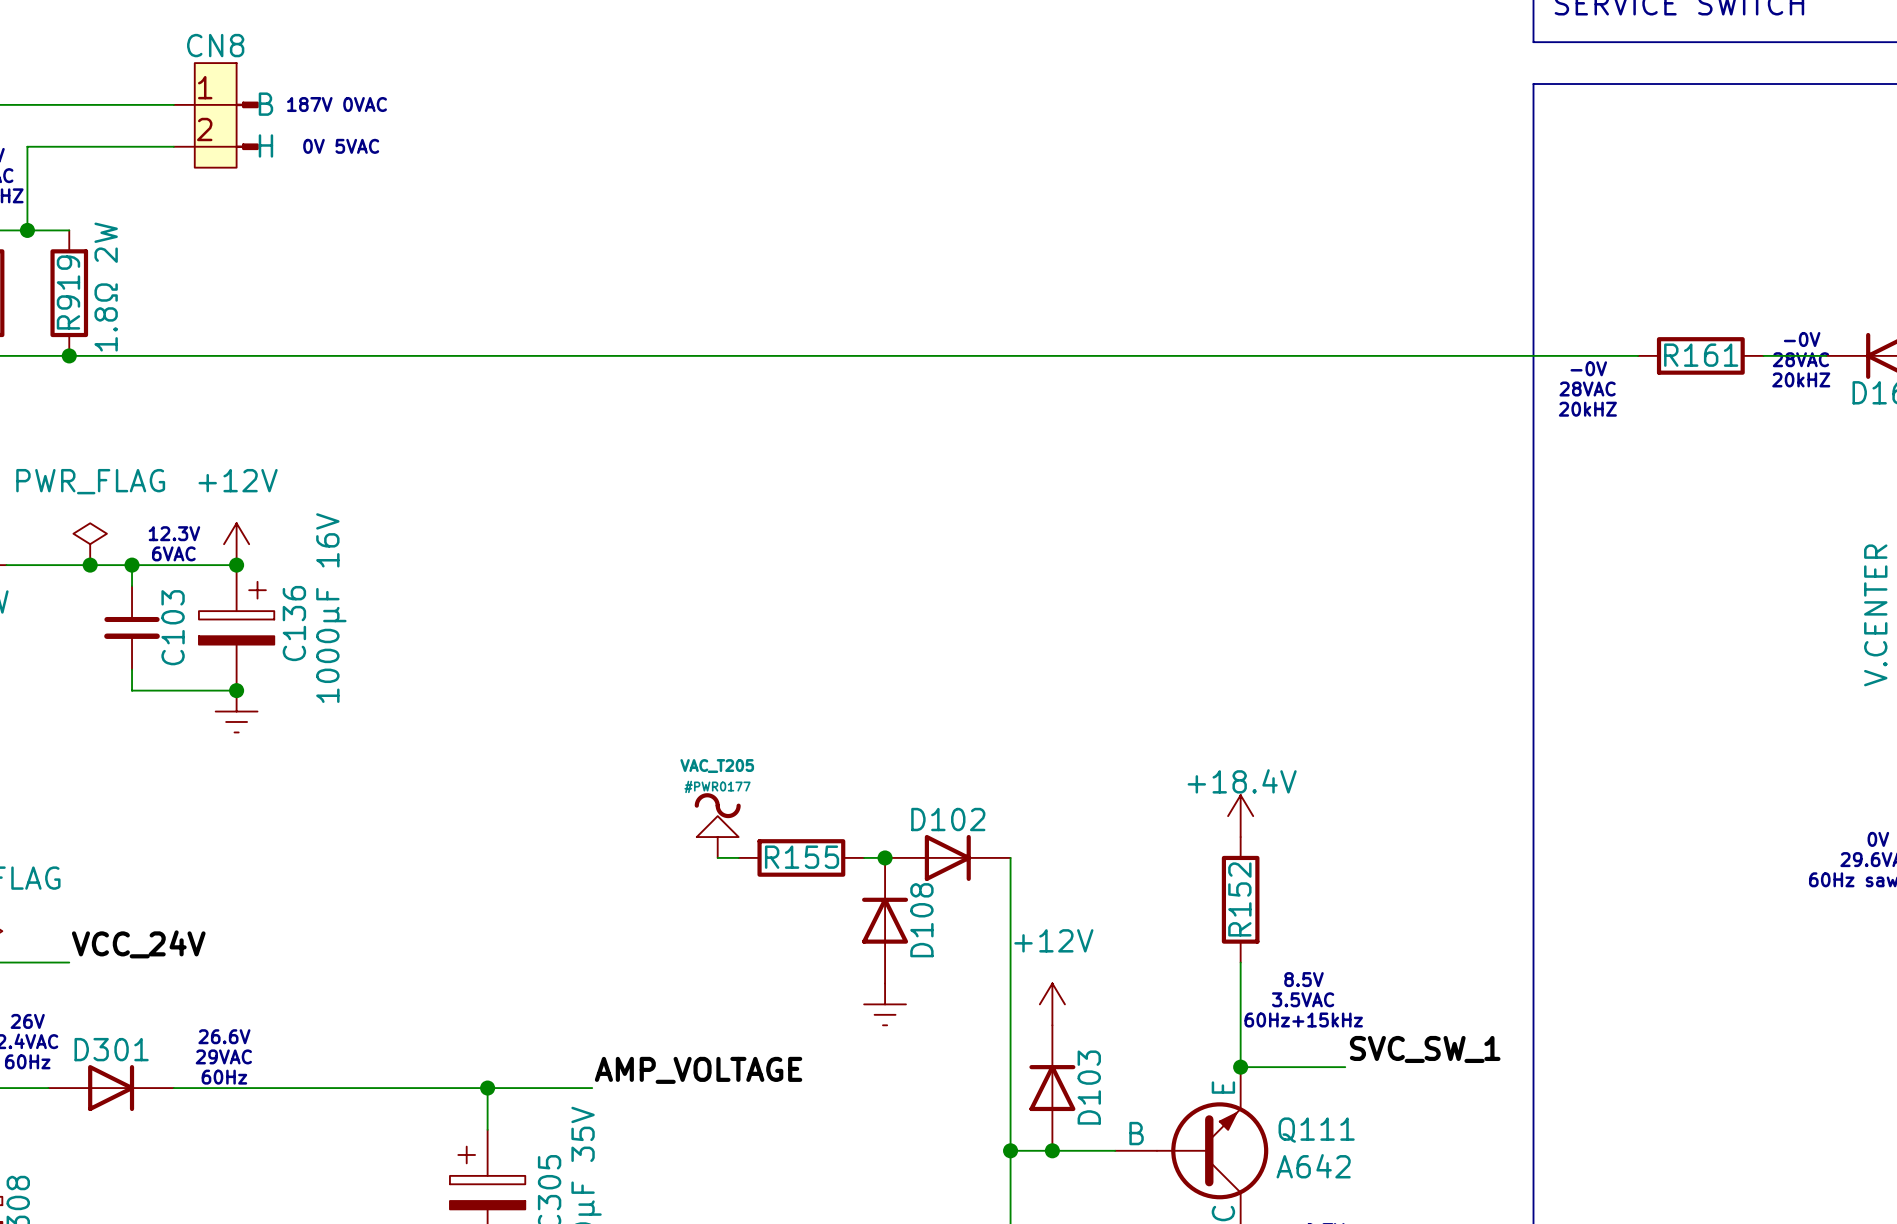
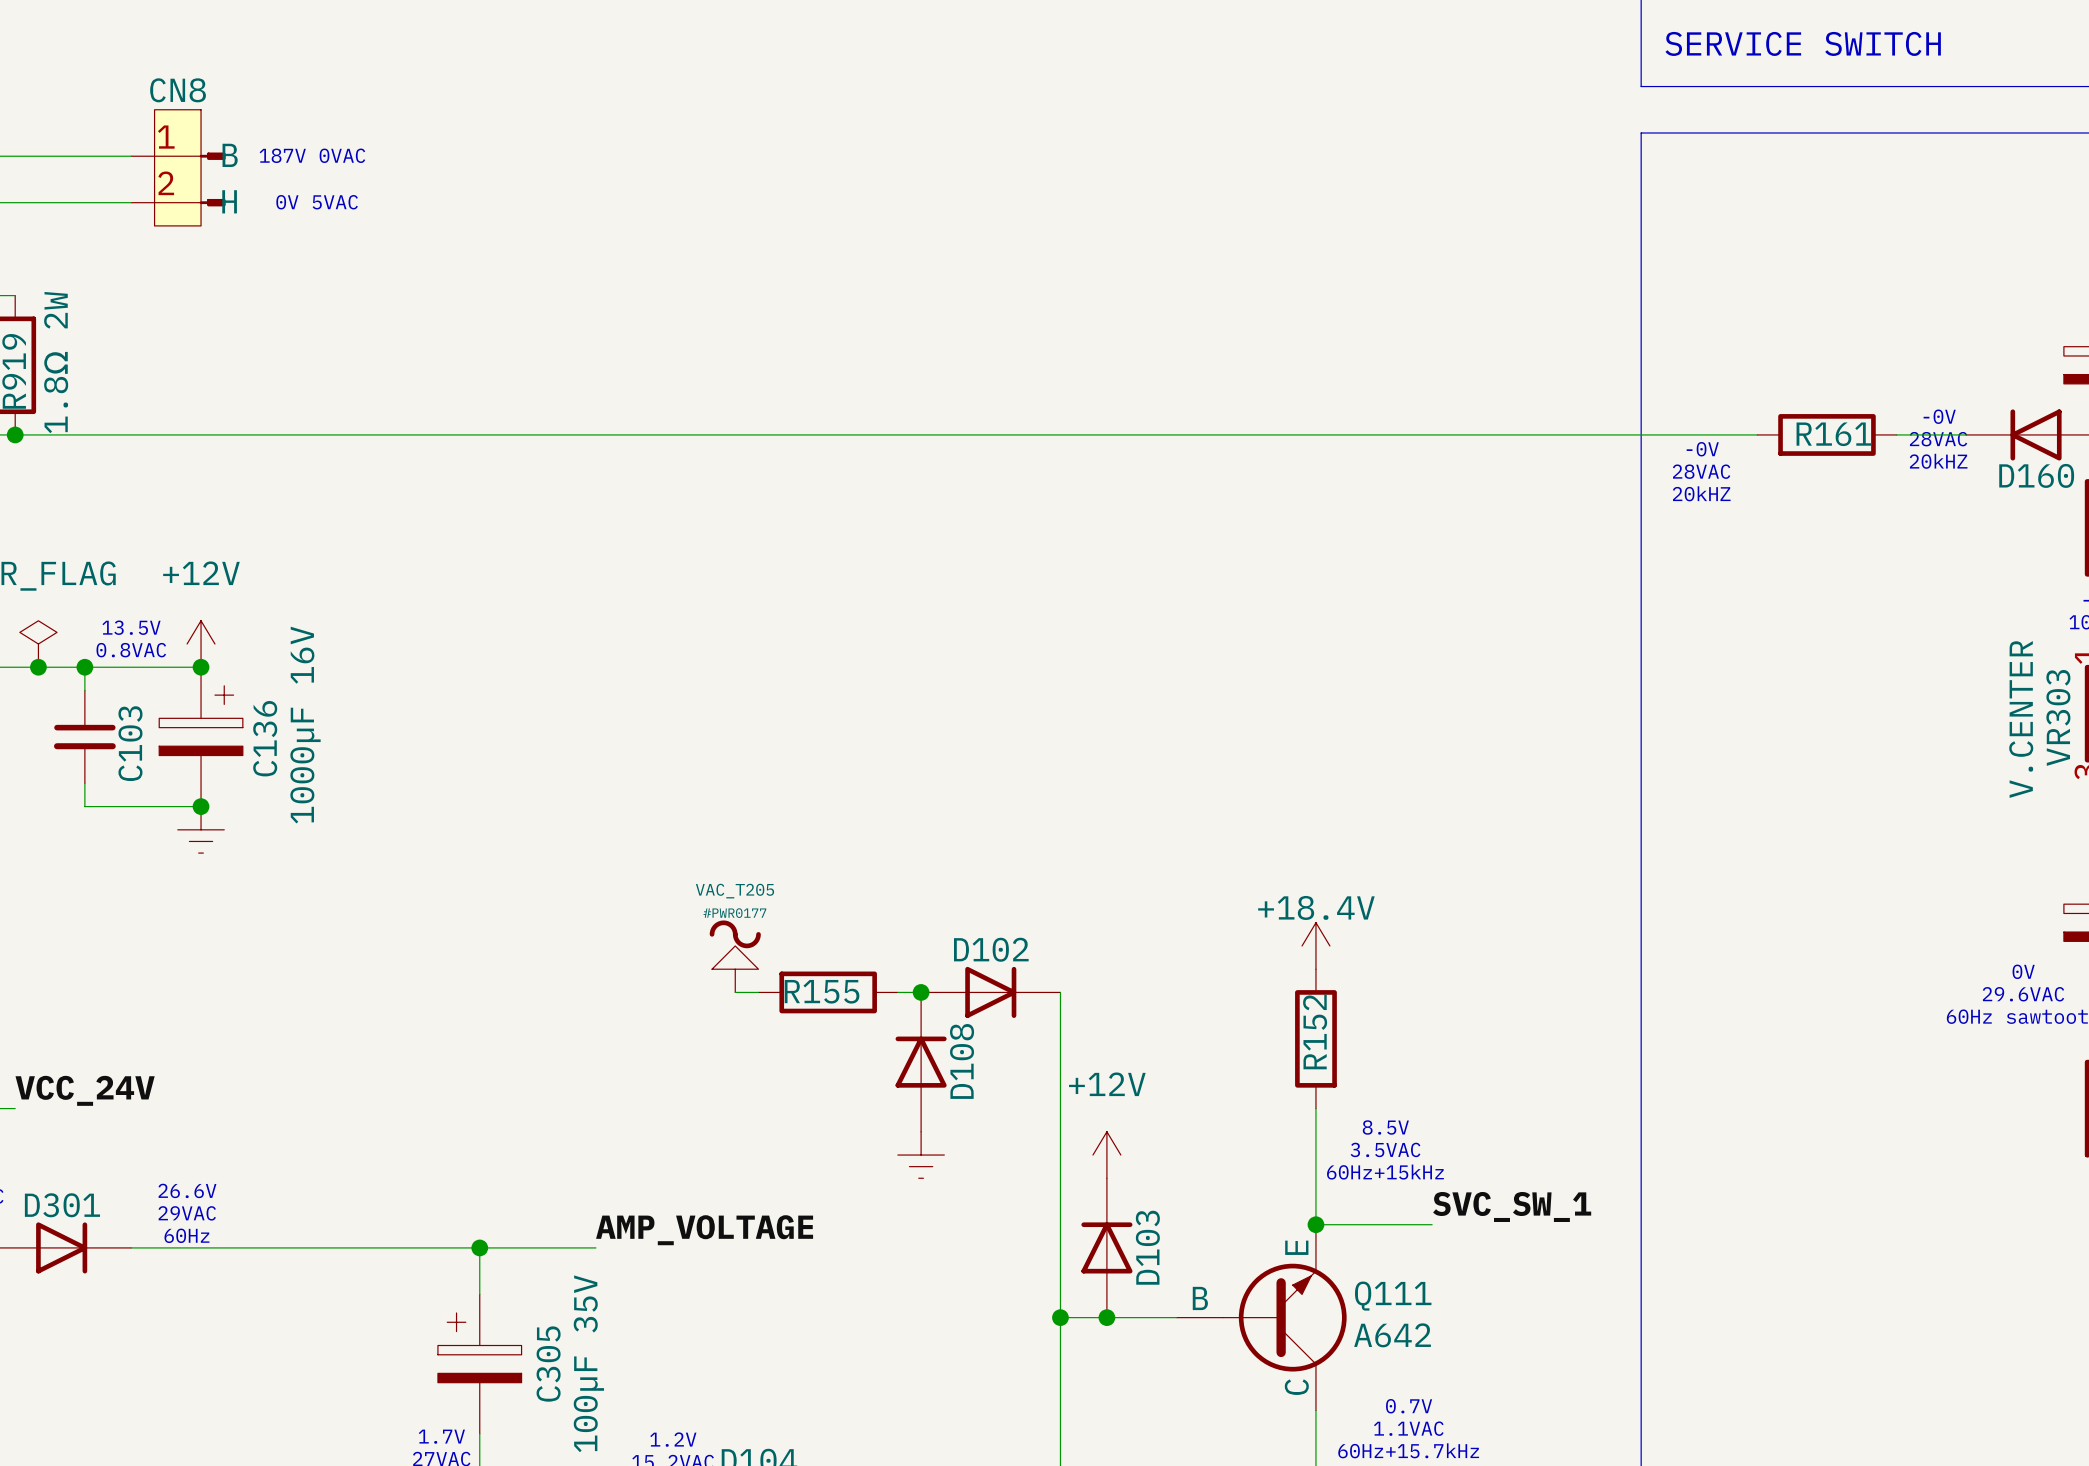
text: 12.3V (174, 533) -> 13.5V (131, 627)
text: 6VAC (173, 553) -> 0.8VAC (131, 650)

